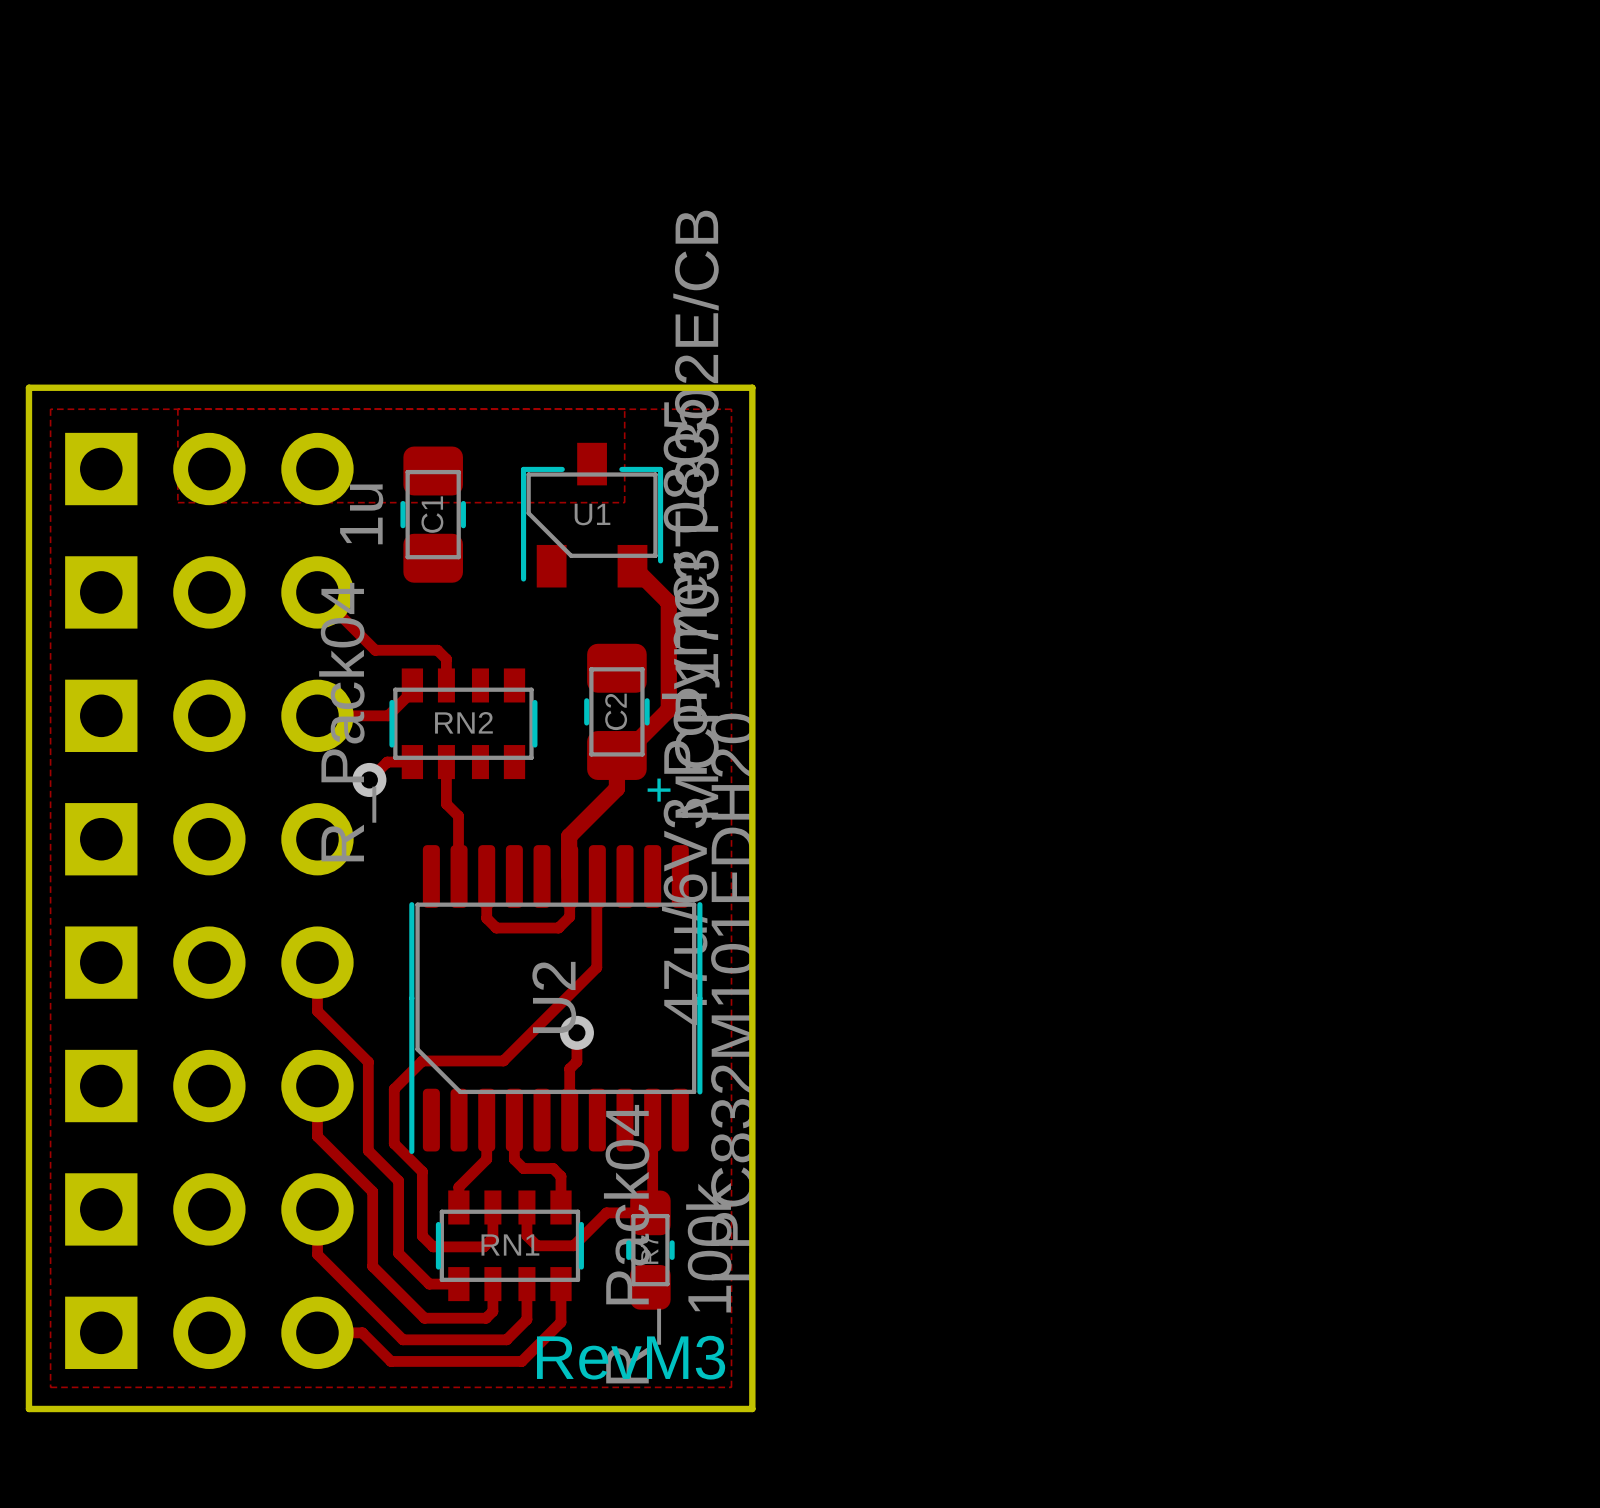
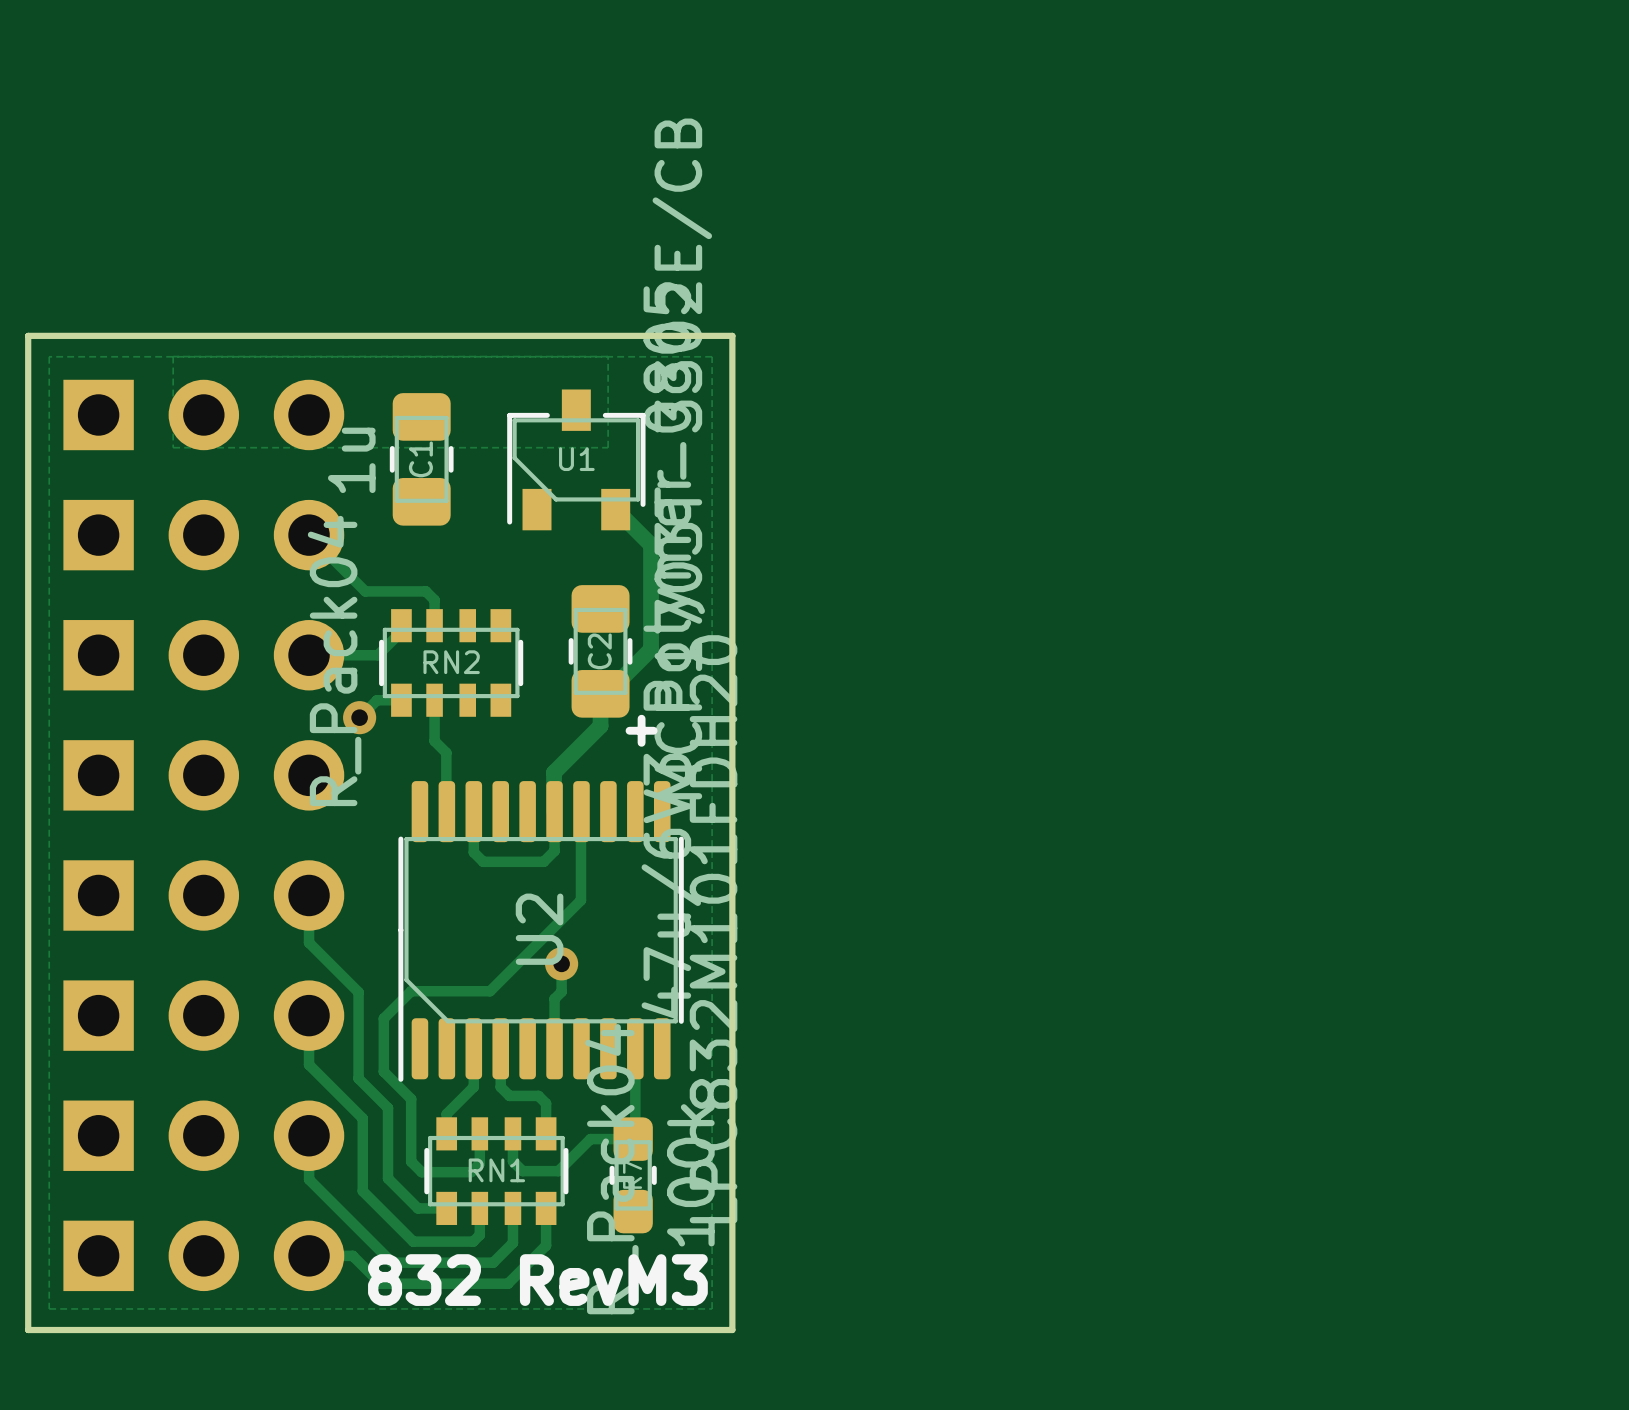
text: RevM3 (631, 1357) -> 832 RevM3 (537, 1280)

